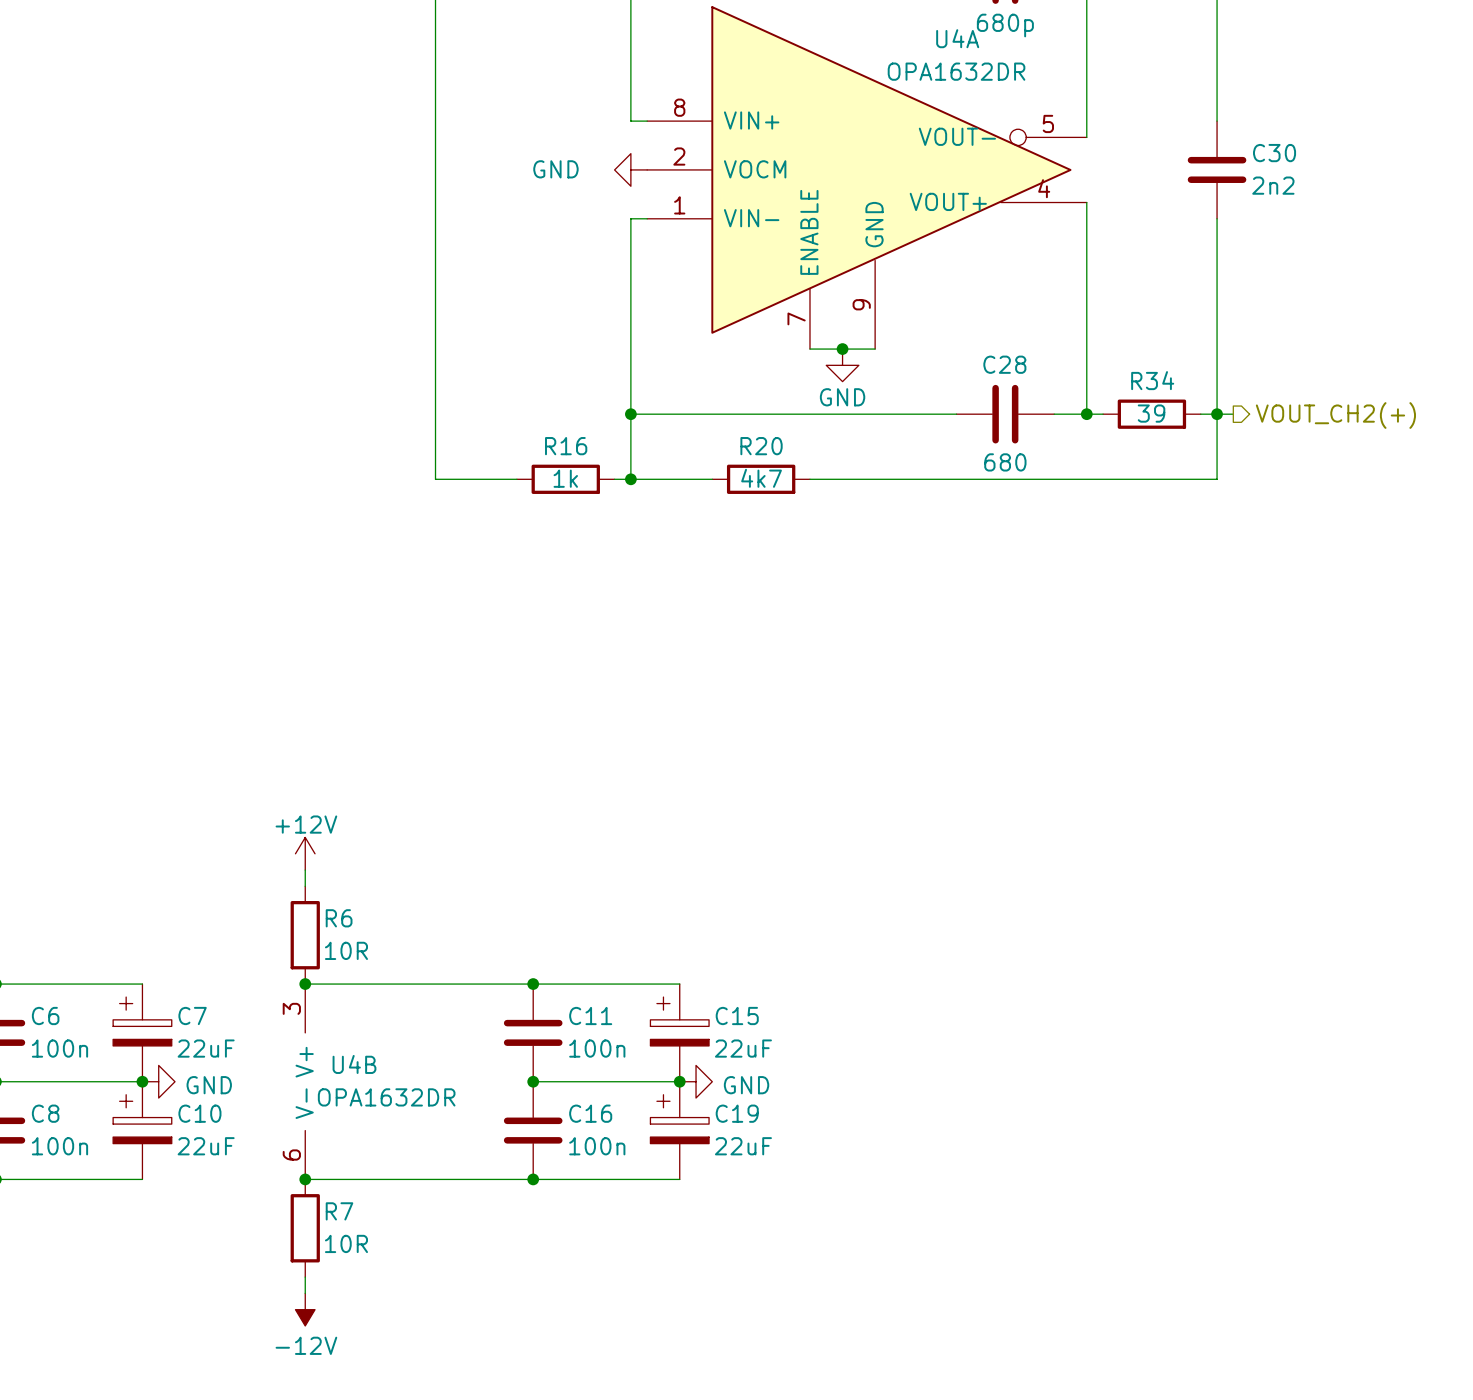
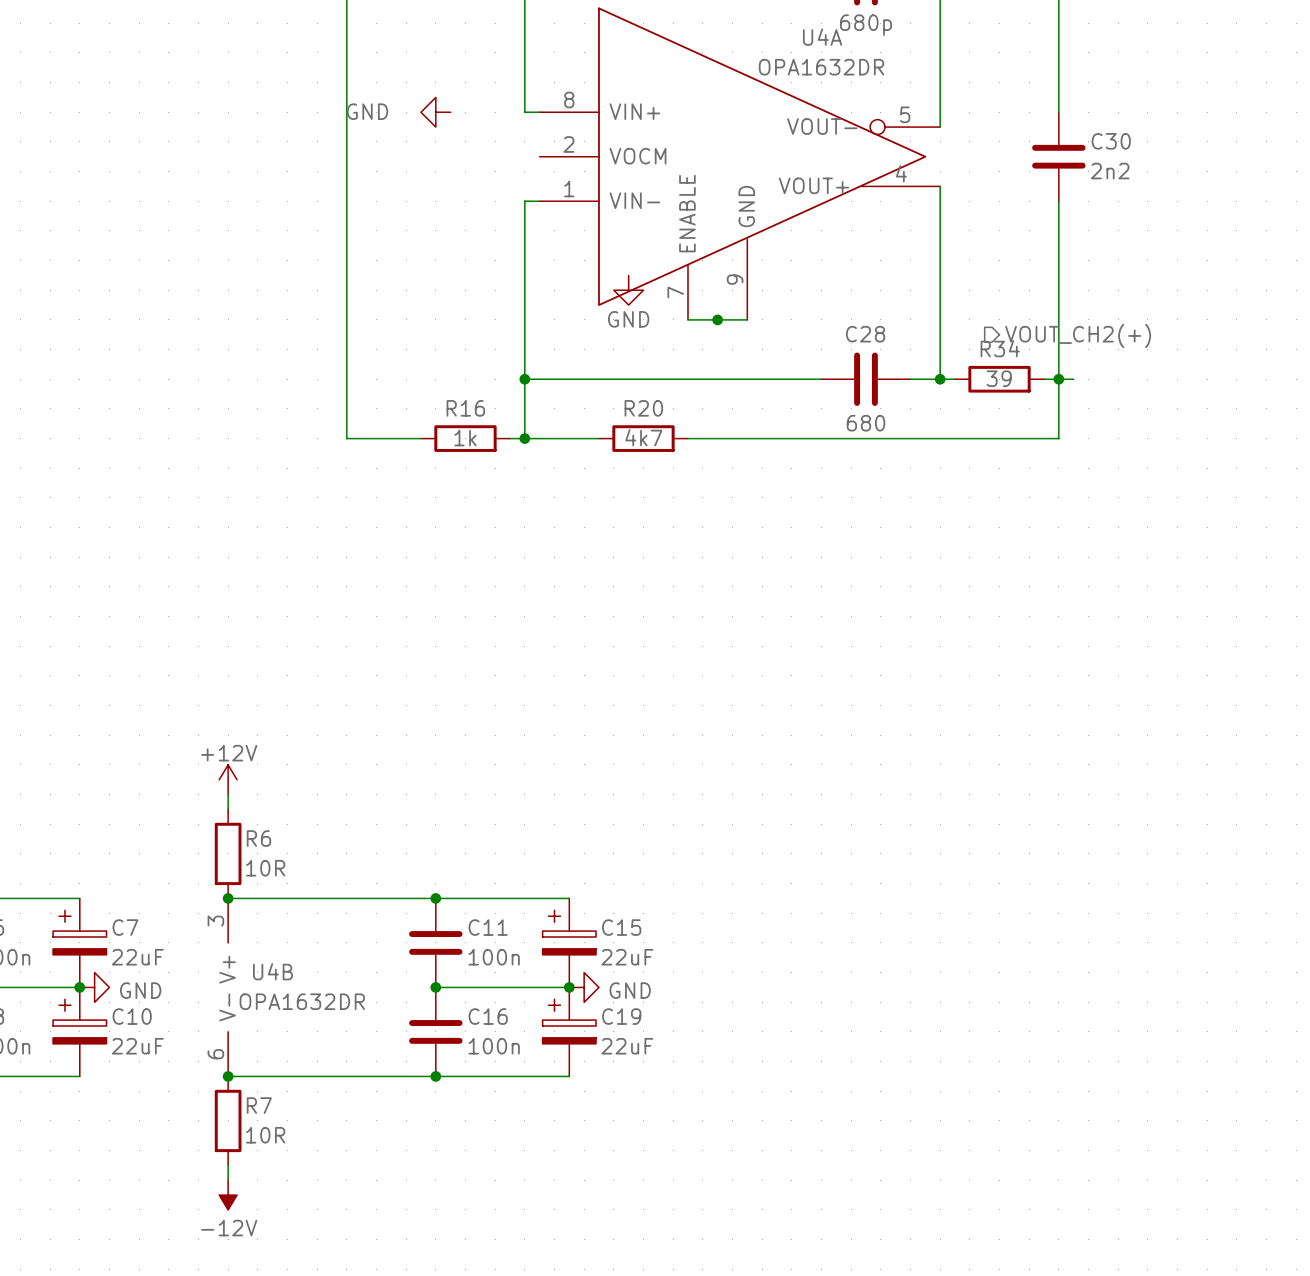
power symbol: none -> GND (435, 112)
power symbol: GND (630, 169) -> none
power symbol: none -> GND (628, 290)
power symbol: GND (842, 365) -> none
hierarchical label position: VOUT_CH2(+) (1335, 415) -> VOUT_CH2(+) (1078, 335)

